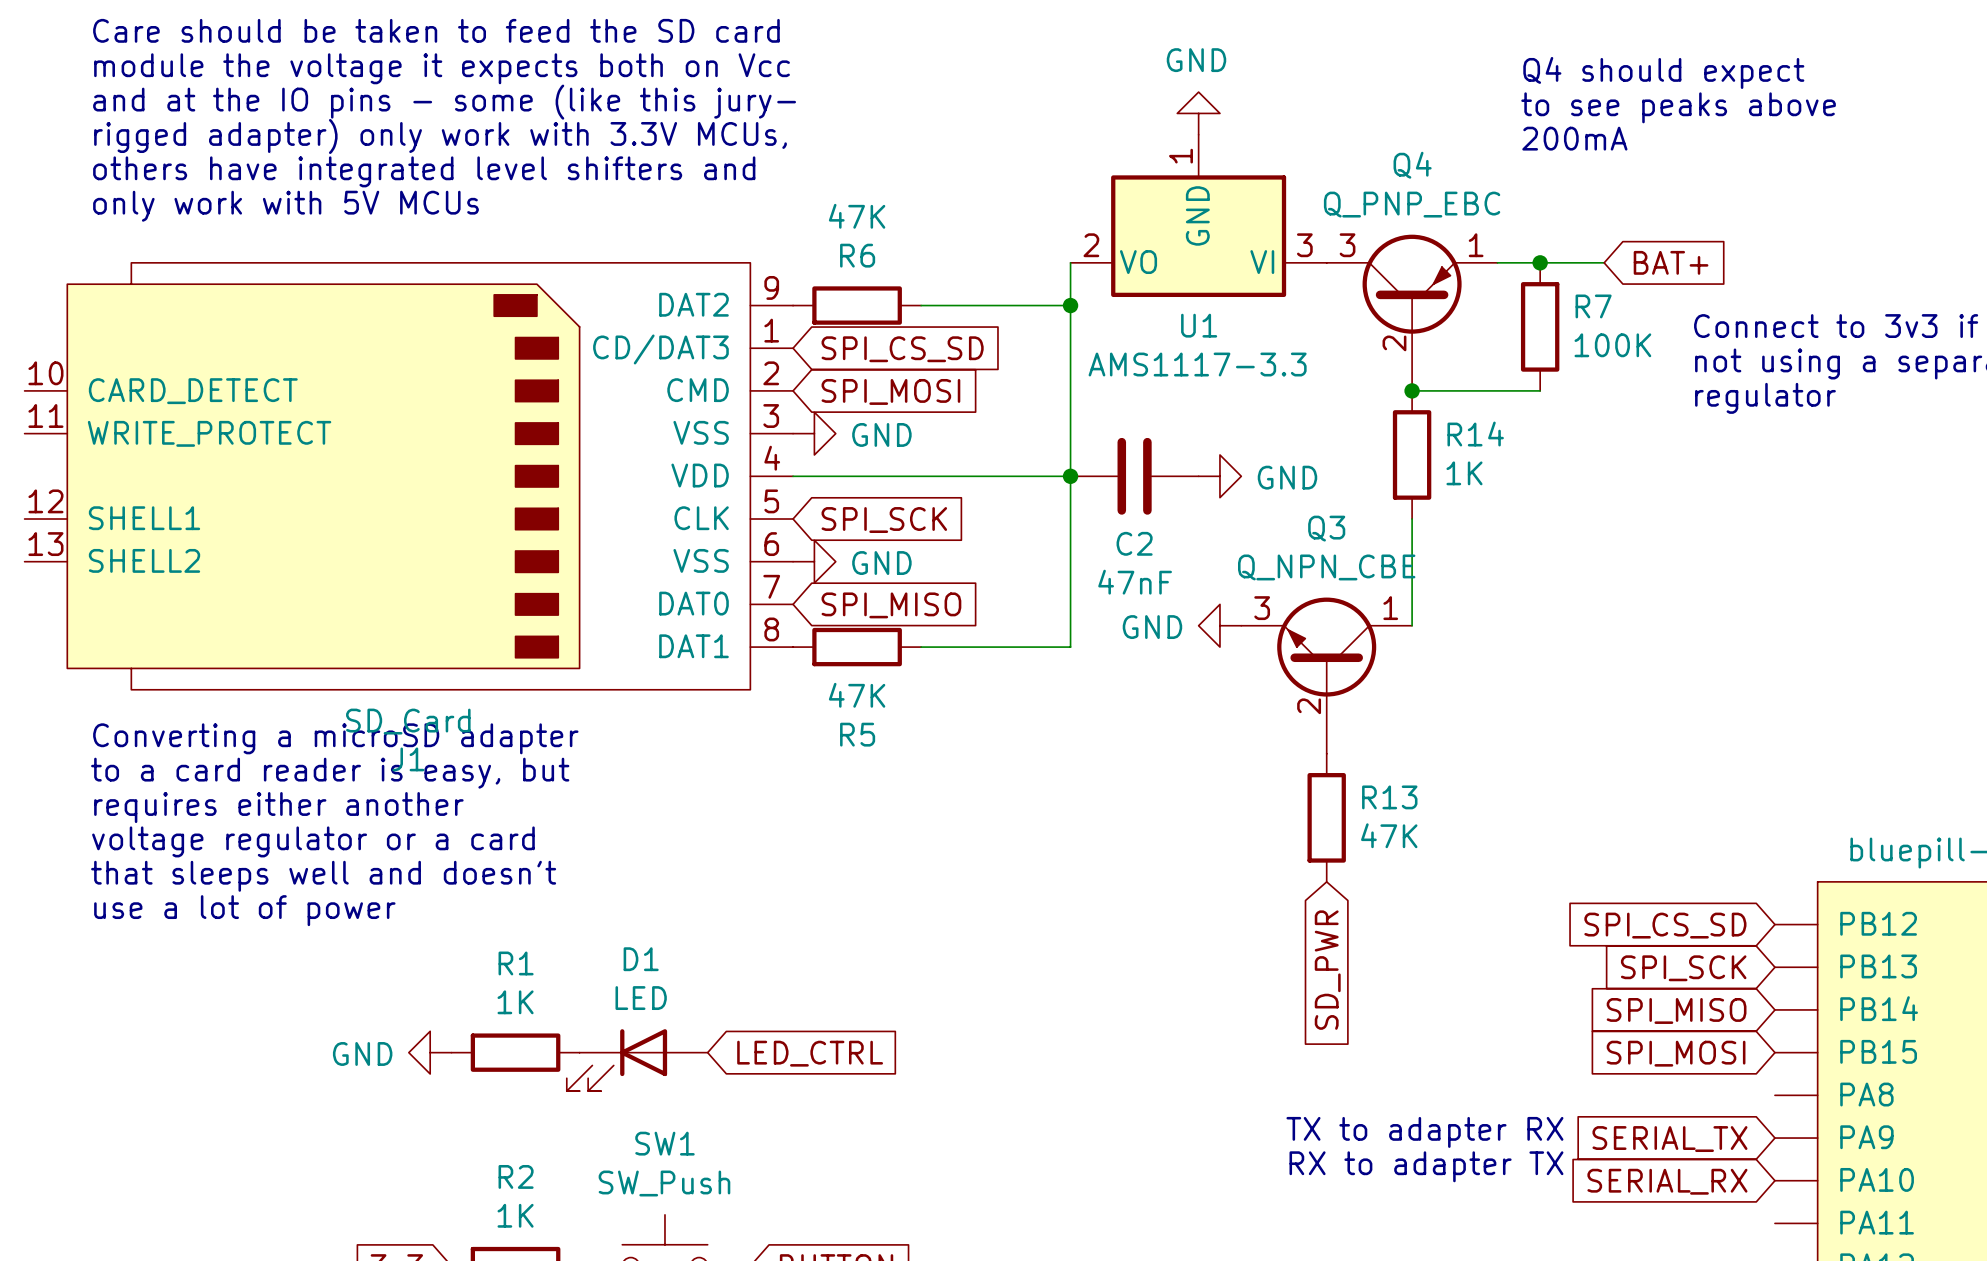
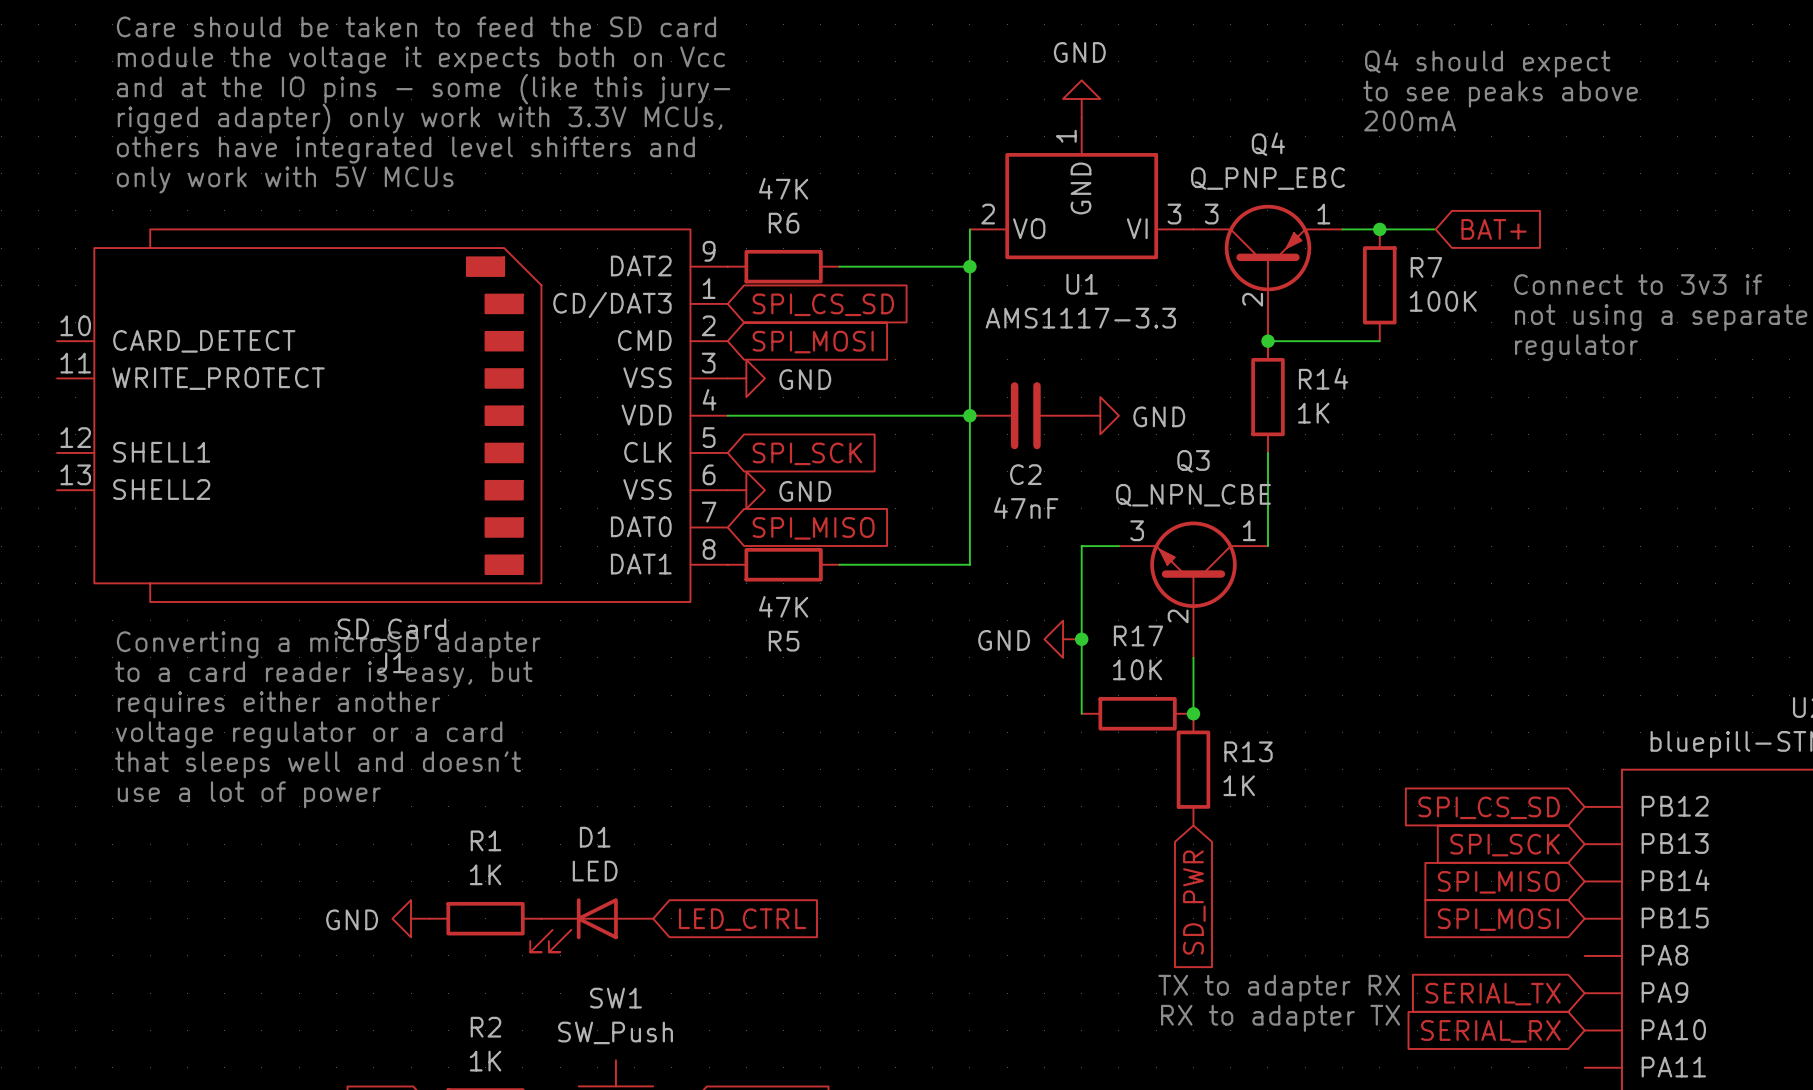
power symbol position: GND (1219, 625) -> GND (1063, 639)
wire: none -> (1118, 546) (1081, 546) (1081, 713)
junction: none -> (1081, 639)
wire: none -> (1193, 657) (1193, 713)
R17: none -> 10K (1137, 713)
R13 position: (1326, 817) -> (1193, 769)
junction: none -> (1193, 713)
R13 value: 47K (1389, 835) -> 1K (1239, 785)
global label position: SD_PWR (1327, 970) -> SD_PWR (1194, 902)

